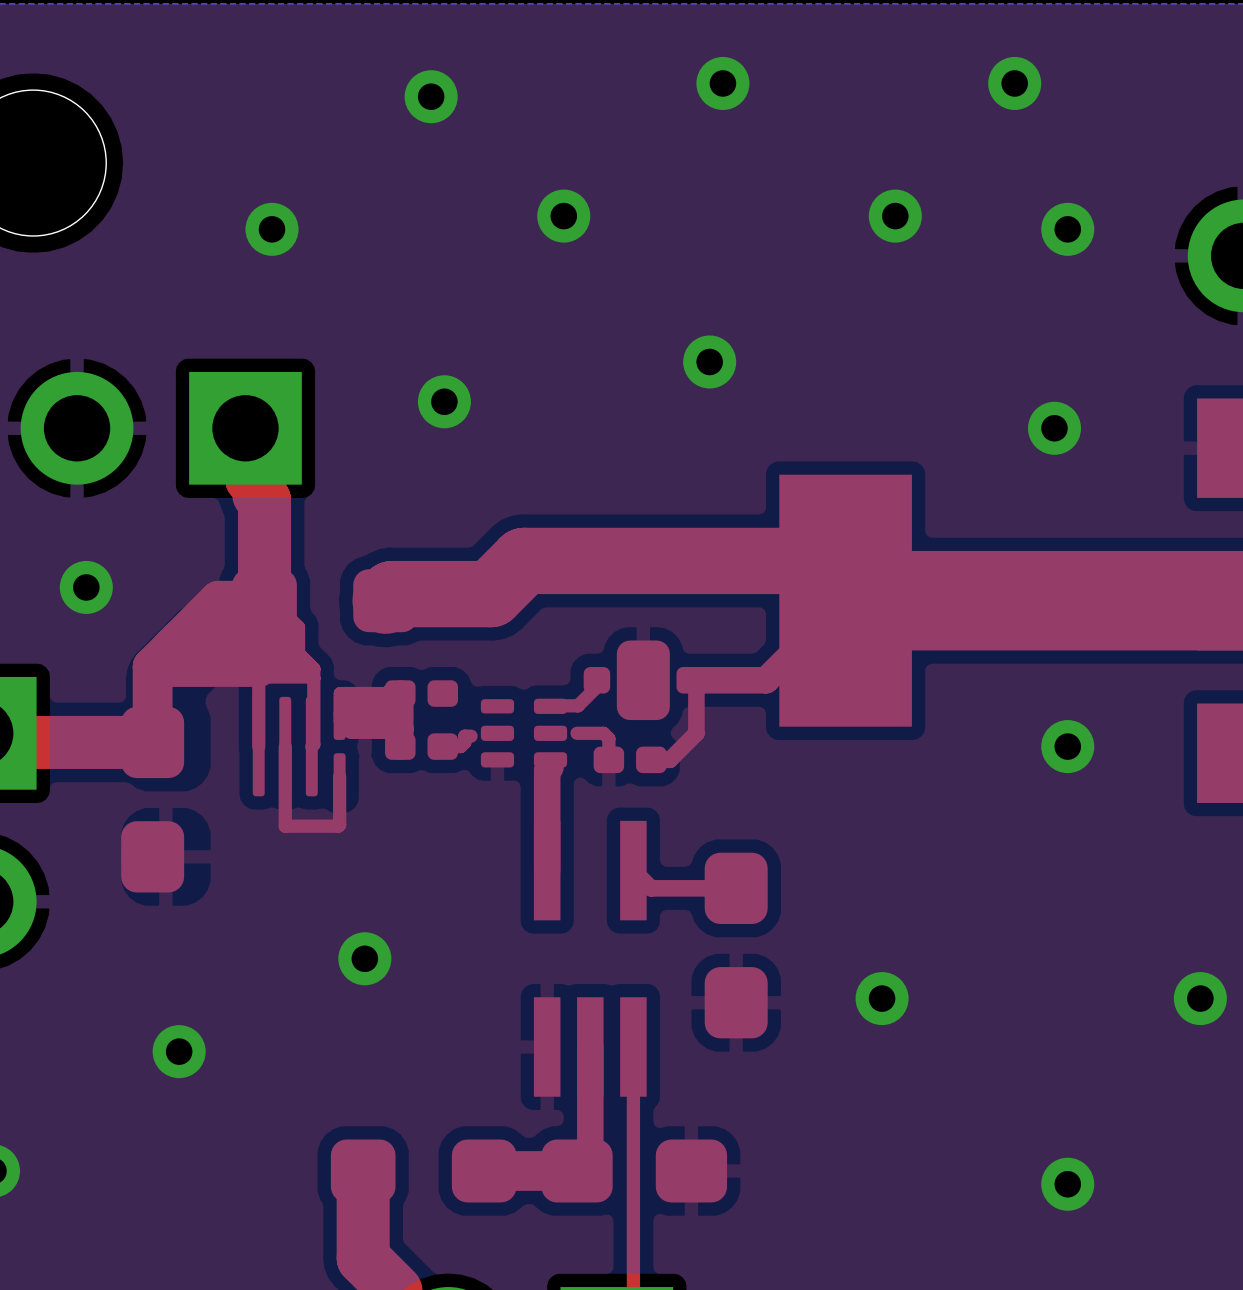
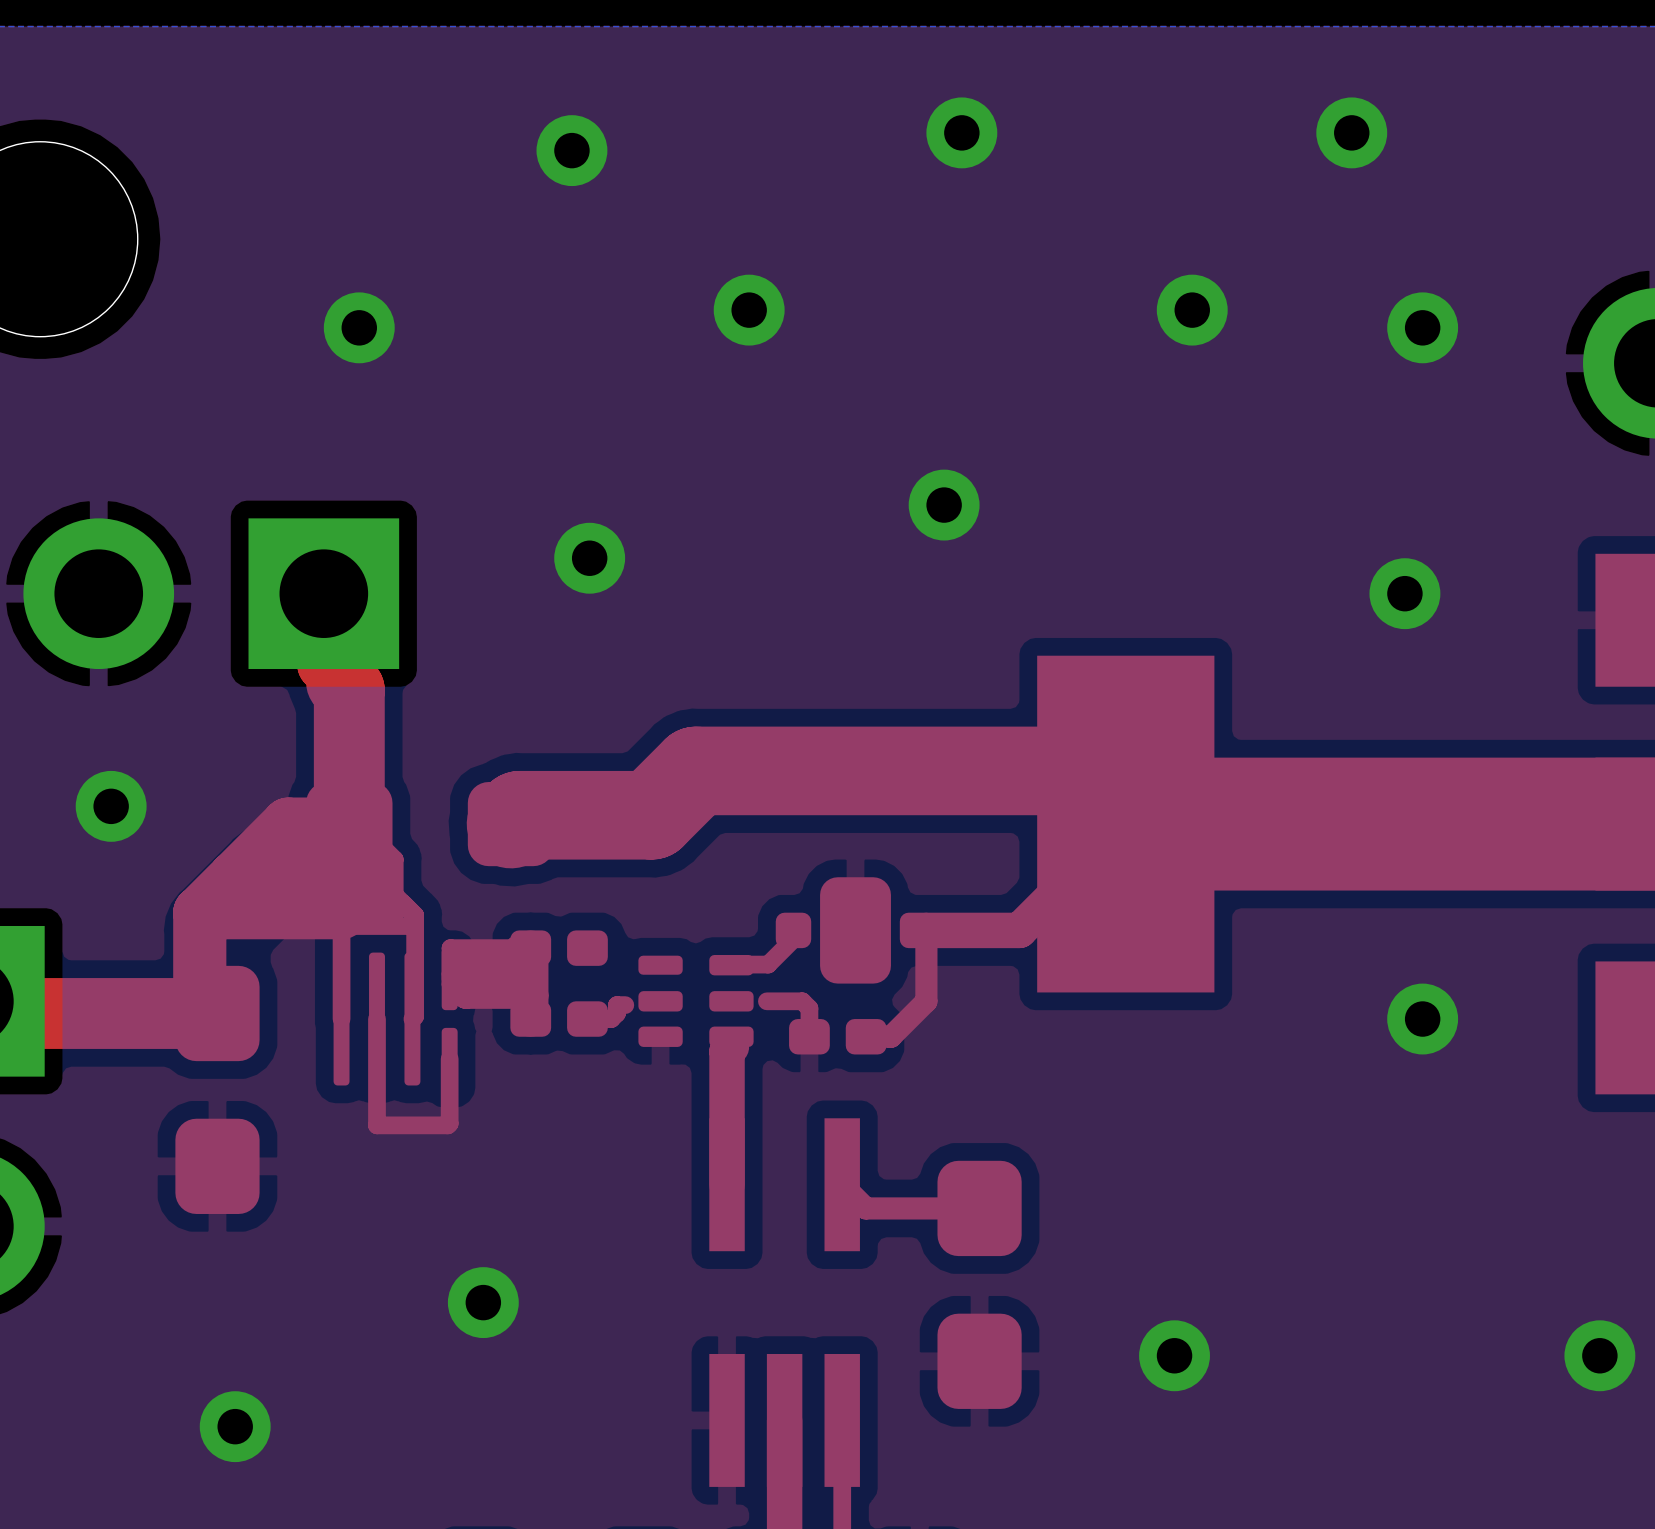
part position: (152, 799) -> (217, 1089)

